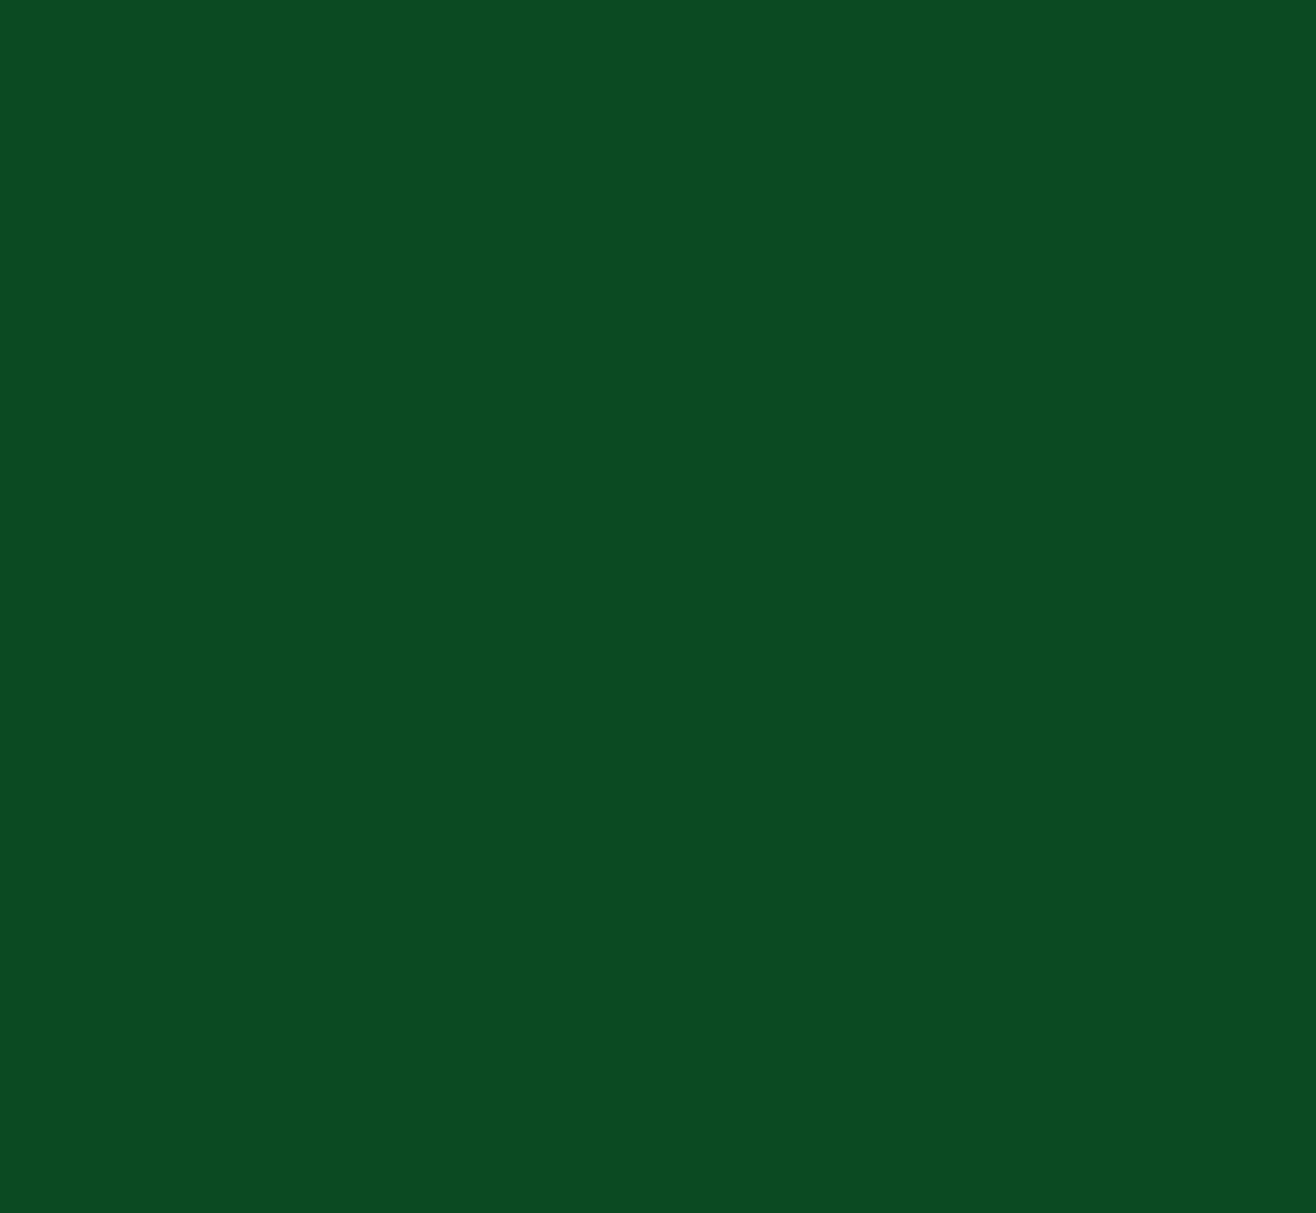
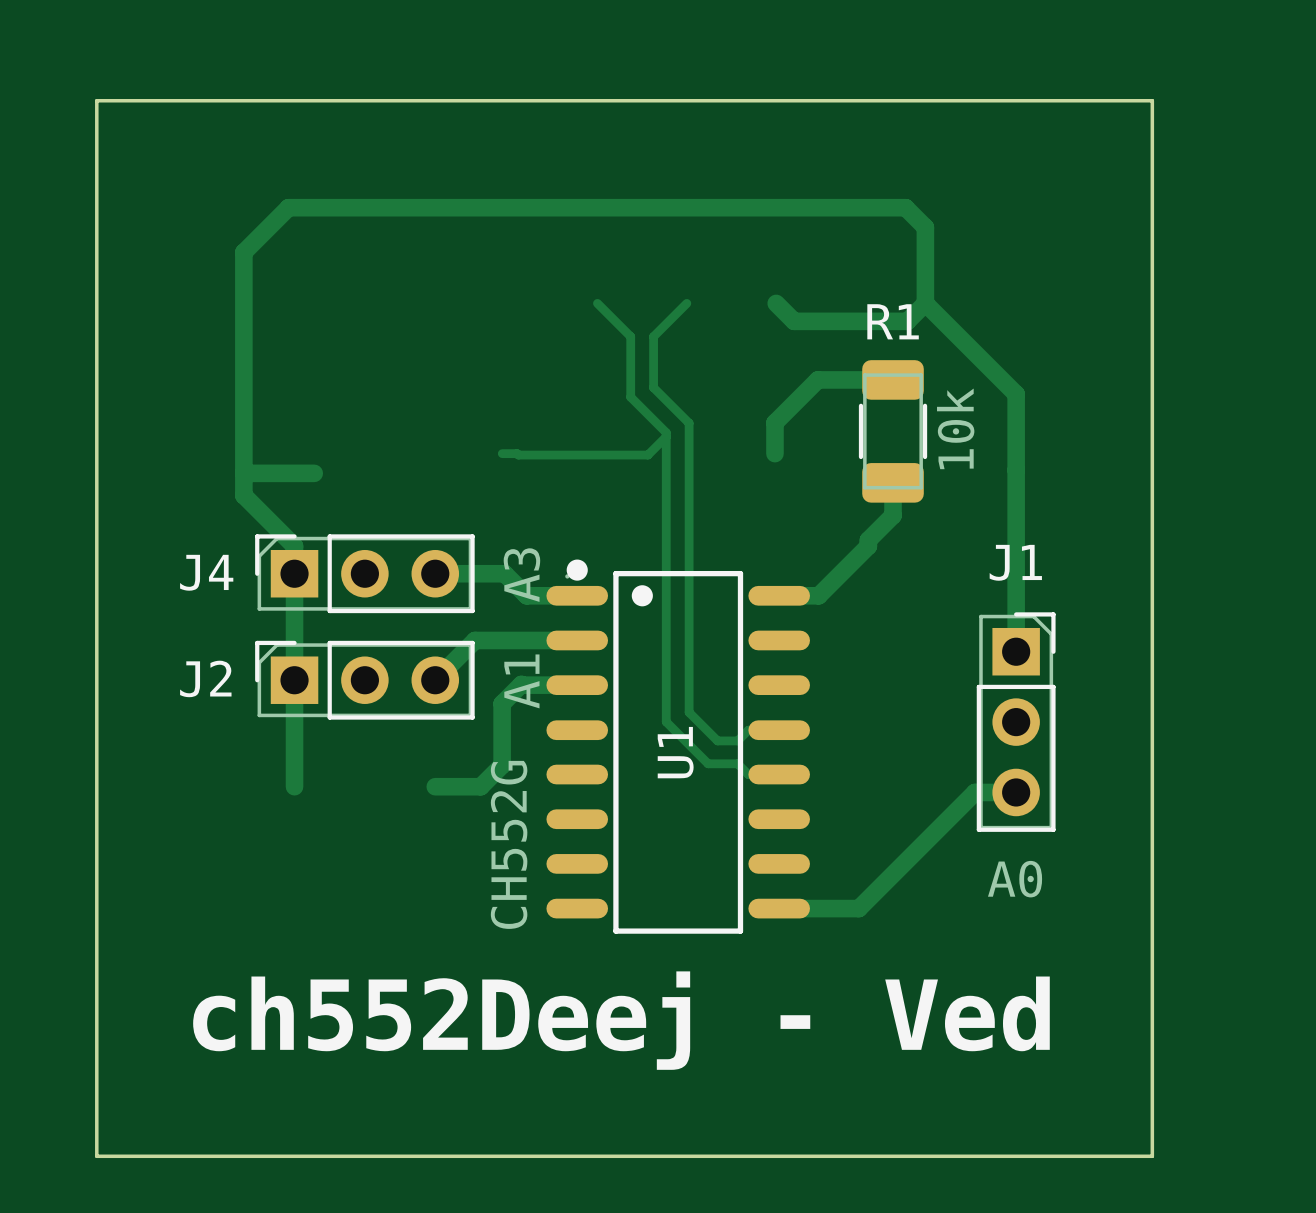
board edge: none -> (96, 100) (96, 1156) (1152, 1156) (1152, 100) (96, 100)
track: none -> (597, 303) (630, 336) (630, 397) (666, 432) (666, 721) (708, 763) (737, 763) (748, 774) (779, 774)
track: none -> (686, 303) (653, 336) (653, 387) (689, 423) (689, 712) (717, 740) (737, 740) (748, 730) (779, 730)
track: none -> (776, 303) (794, 321) (907, 321) (925, 303)
track: none -> (925, 303) (925, 227) (905, 207) (288, 207) (243, 252) (243, 495) (294, 546) (294, 786)
track: none -> (925, 303) (1016, 394) (1016, 651)
track: none -> (893, 379) (817, 379) (774, 422) (774, 453)
R1: none -> 10k (893, 431)
track: none -> (666, 436) (647, 455) (502, 453)
track: none -> (244, 473) (314, 473)
track: none -> (893, 482) (893, 515) (868, 540) (868, 546) (818, 595) (779, 595)
J4: none -> A3 (364, 573)
track: none -> (435, 573) (504, 573) (526, 595) (577, 595)
track: none -> (577, 640) (475, 640) (435, 680)
J2: none -> A1 (364, 680)
track: none -> (577, 685) (521, 684) (502, 703) (502, 765) (480, 786) (435, 786)
J1: none -> A0 (1016, 722)
U1: none -> CH552G (678, 746)
track: none -> (1016, 792) (974, 792) (858, 908) (779, 908)
text: none -> ch552Deej - Ved (621, 1020)

